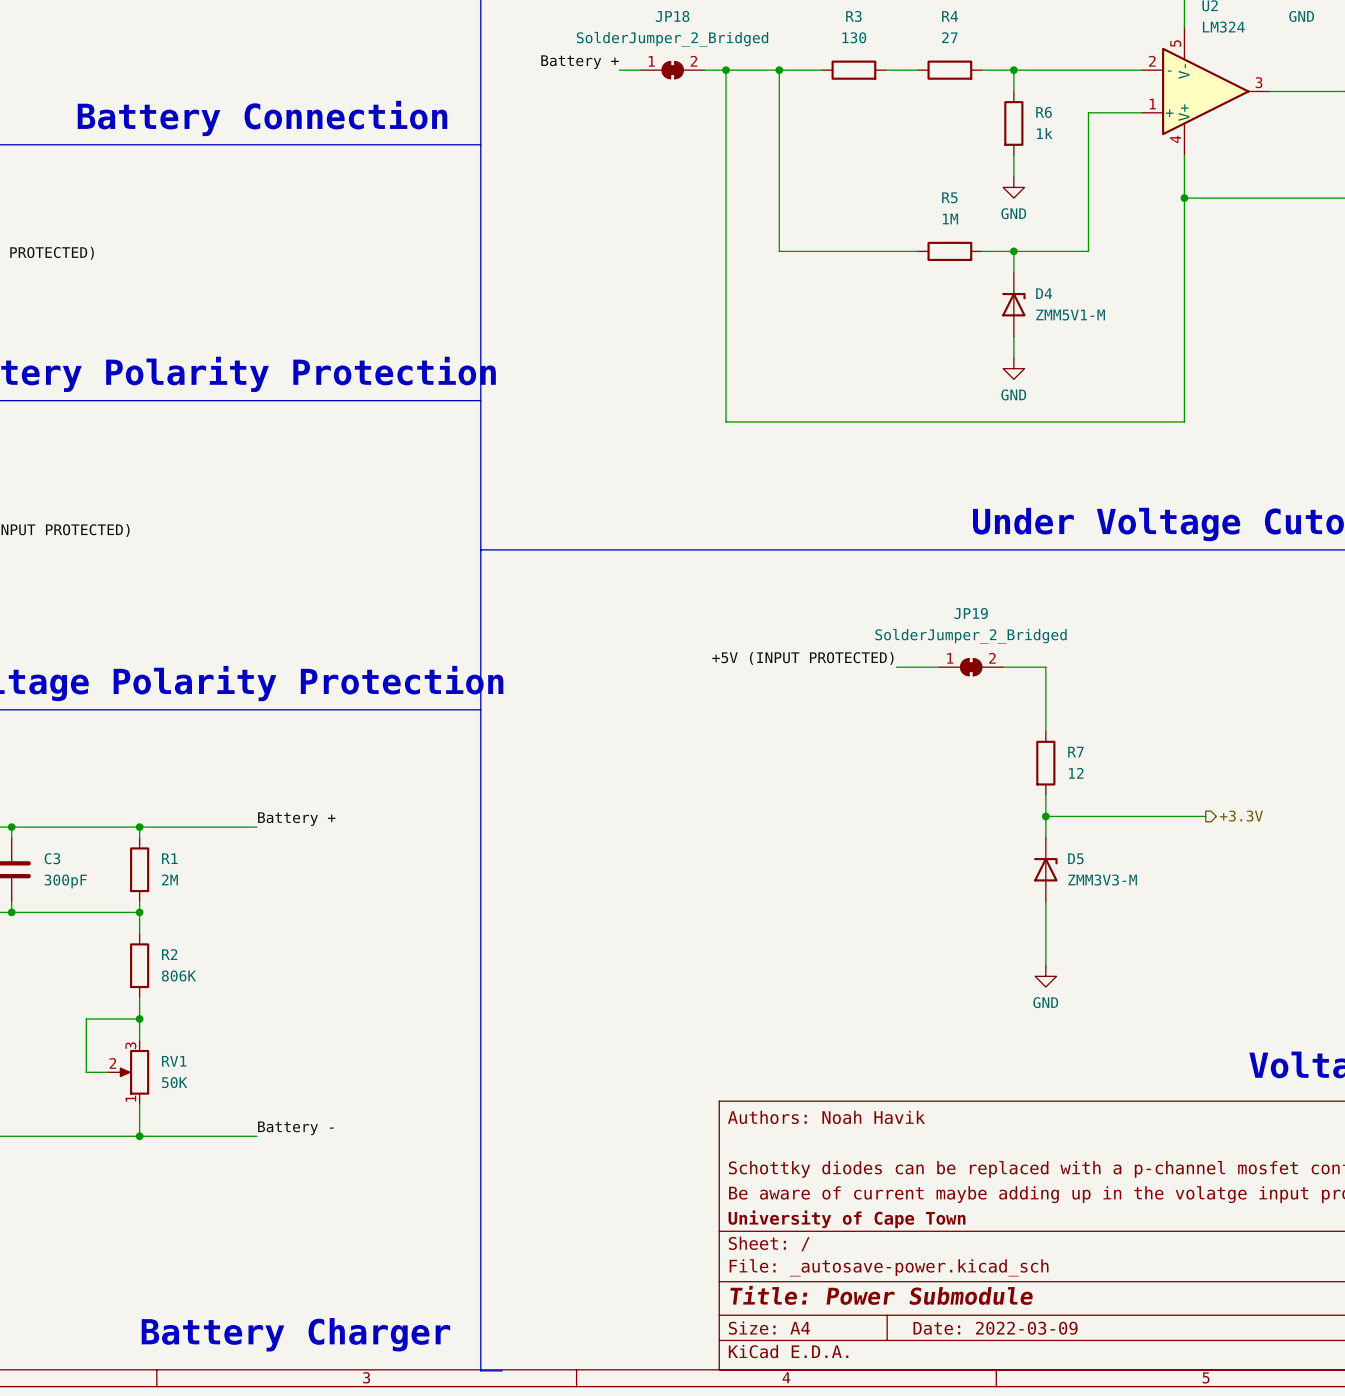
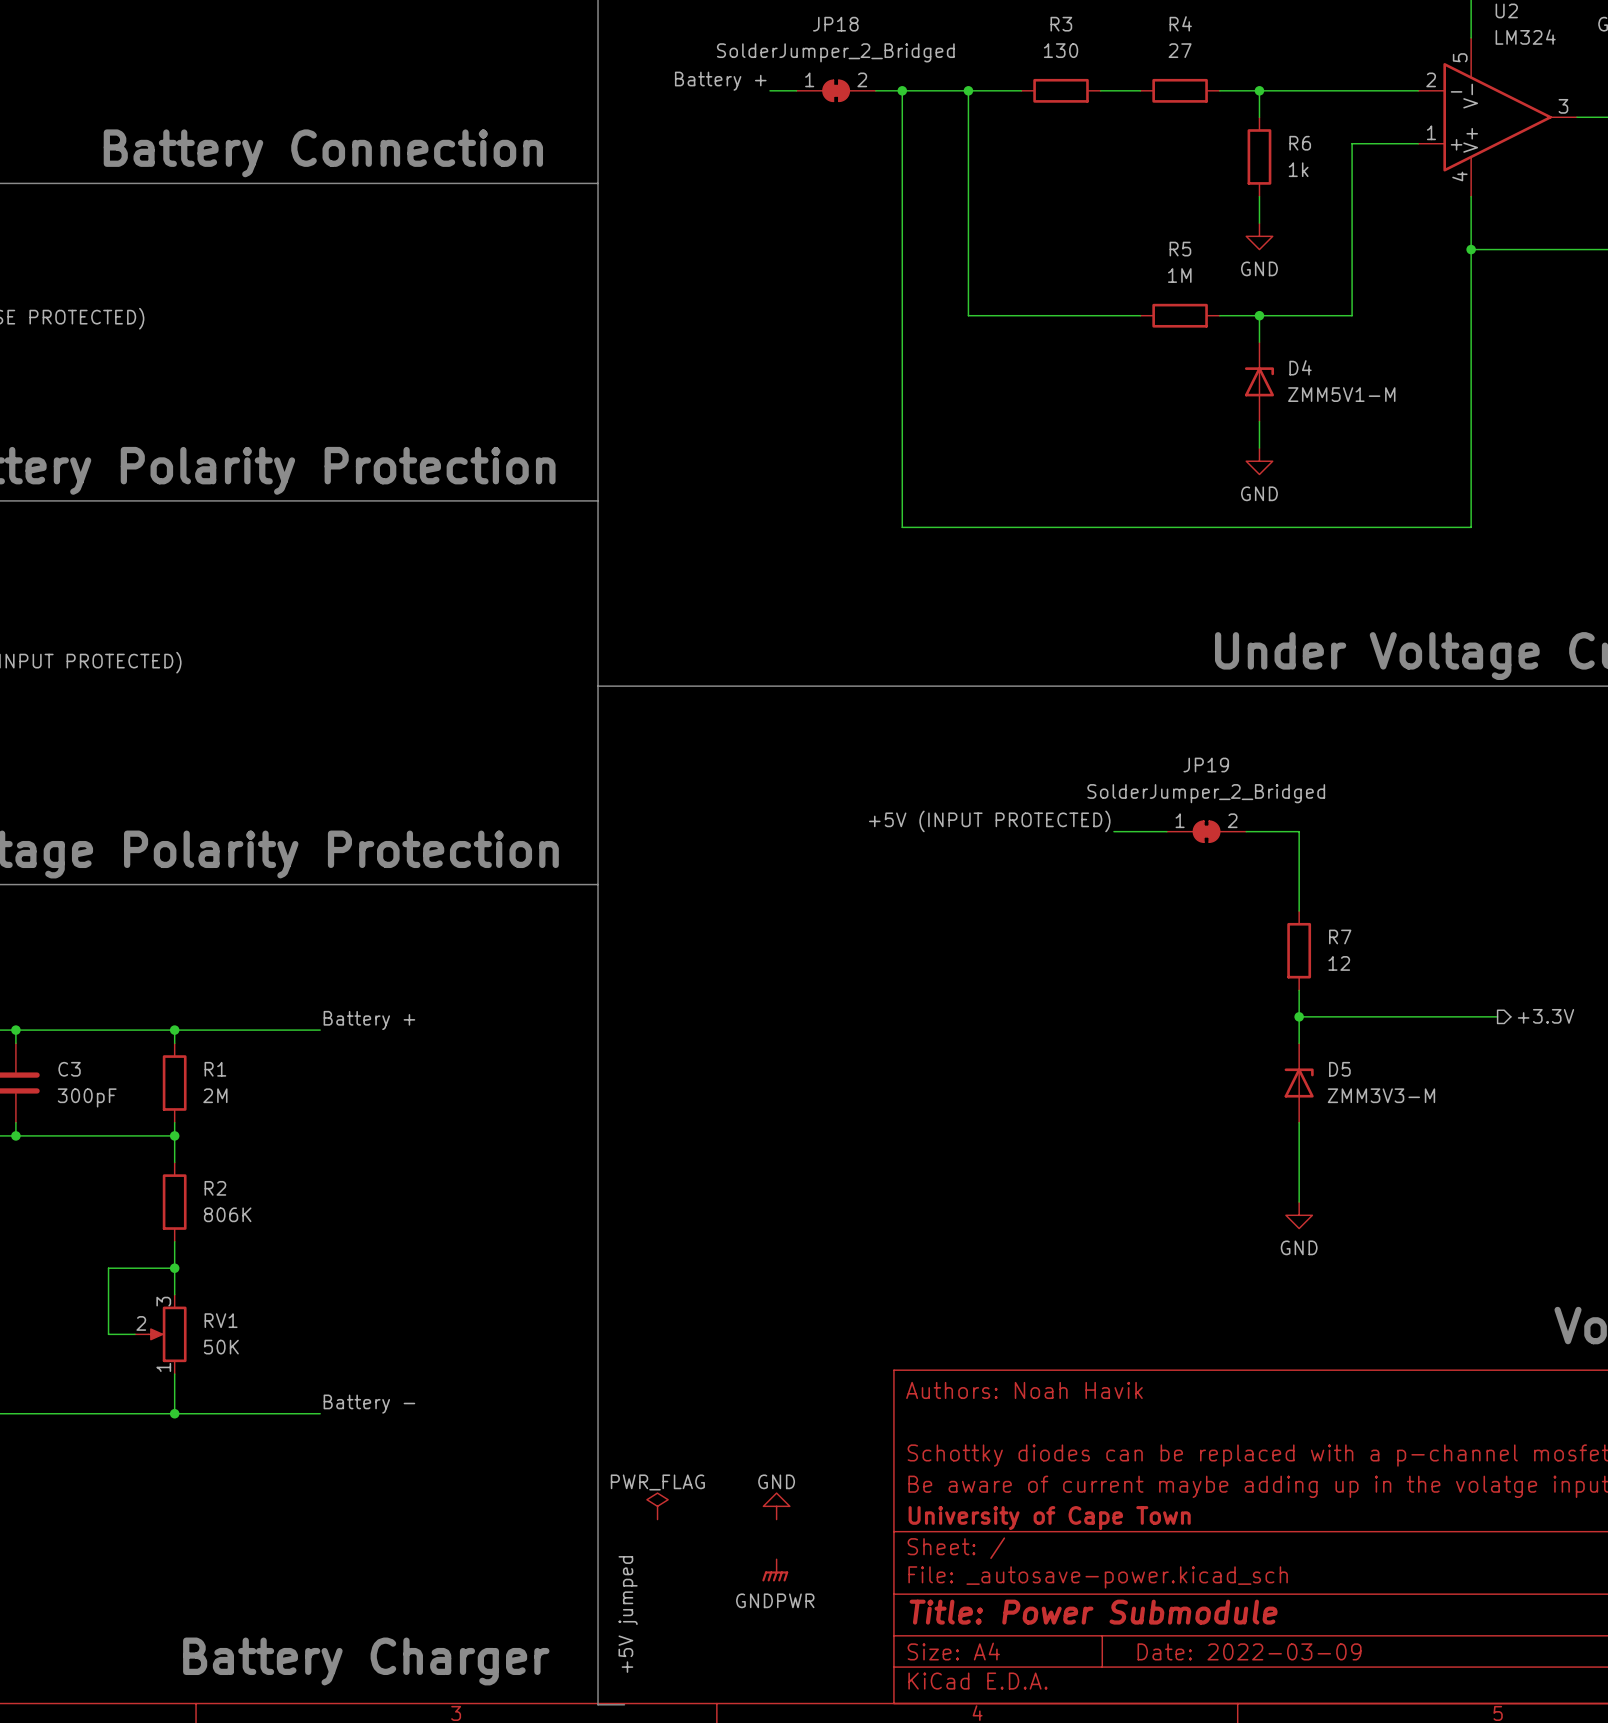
power symbol: none -> PWR_FLAG (657, 1506)
power symbol: none -> GND (776, 1506)
power symbol: none -> GNDPWR (775, 1570)
label: none -> +5V jumped (628, 1614)

